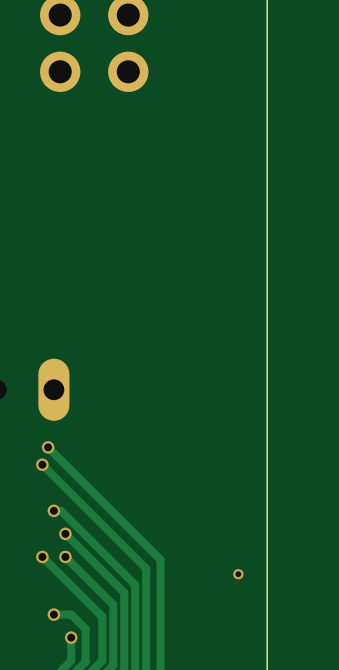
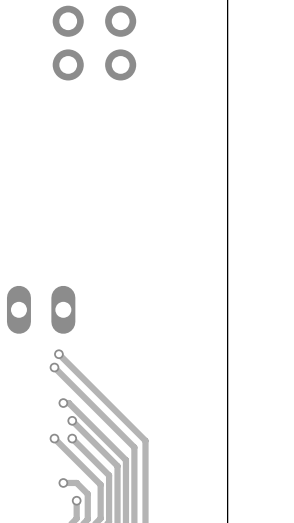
via: (238, 574) -> none

